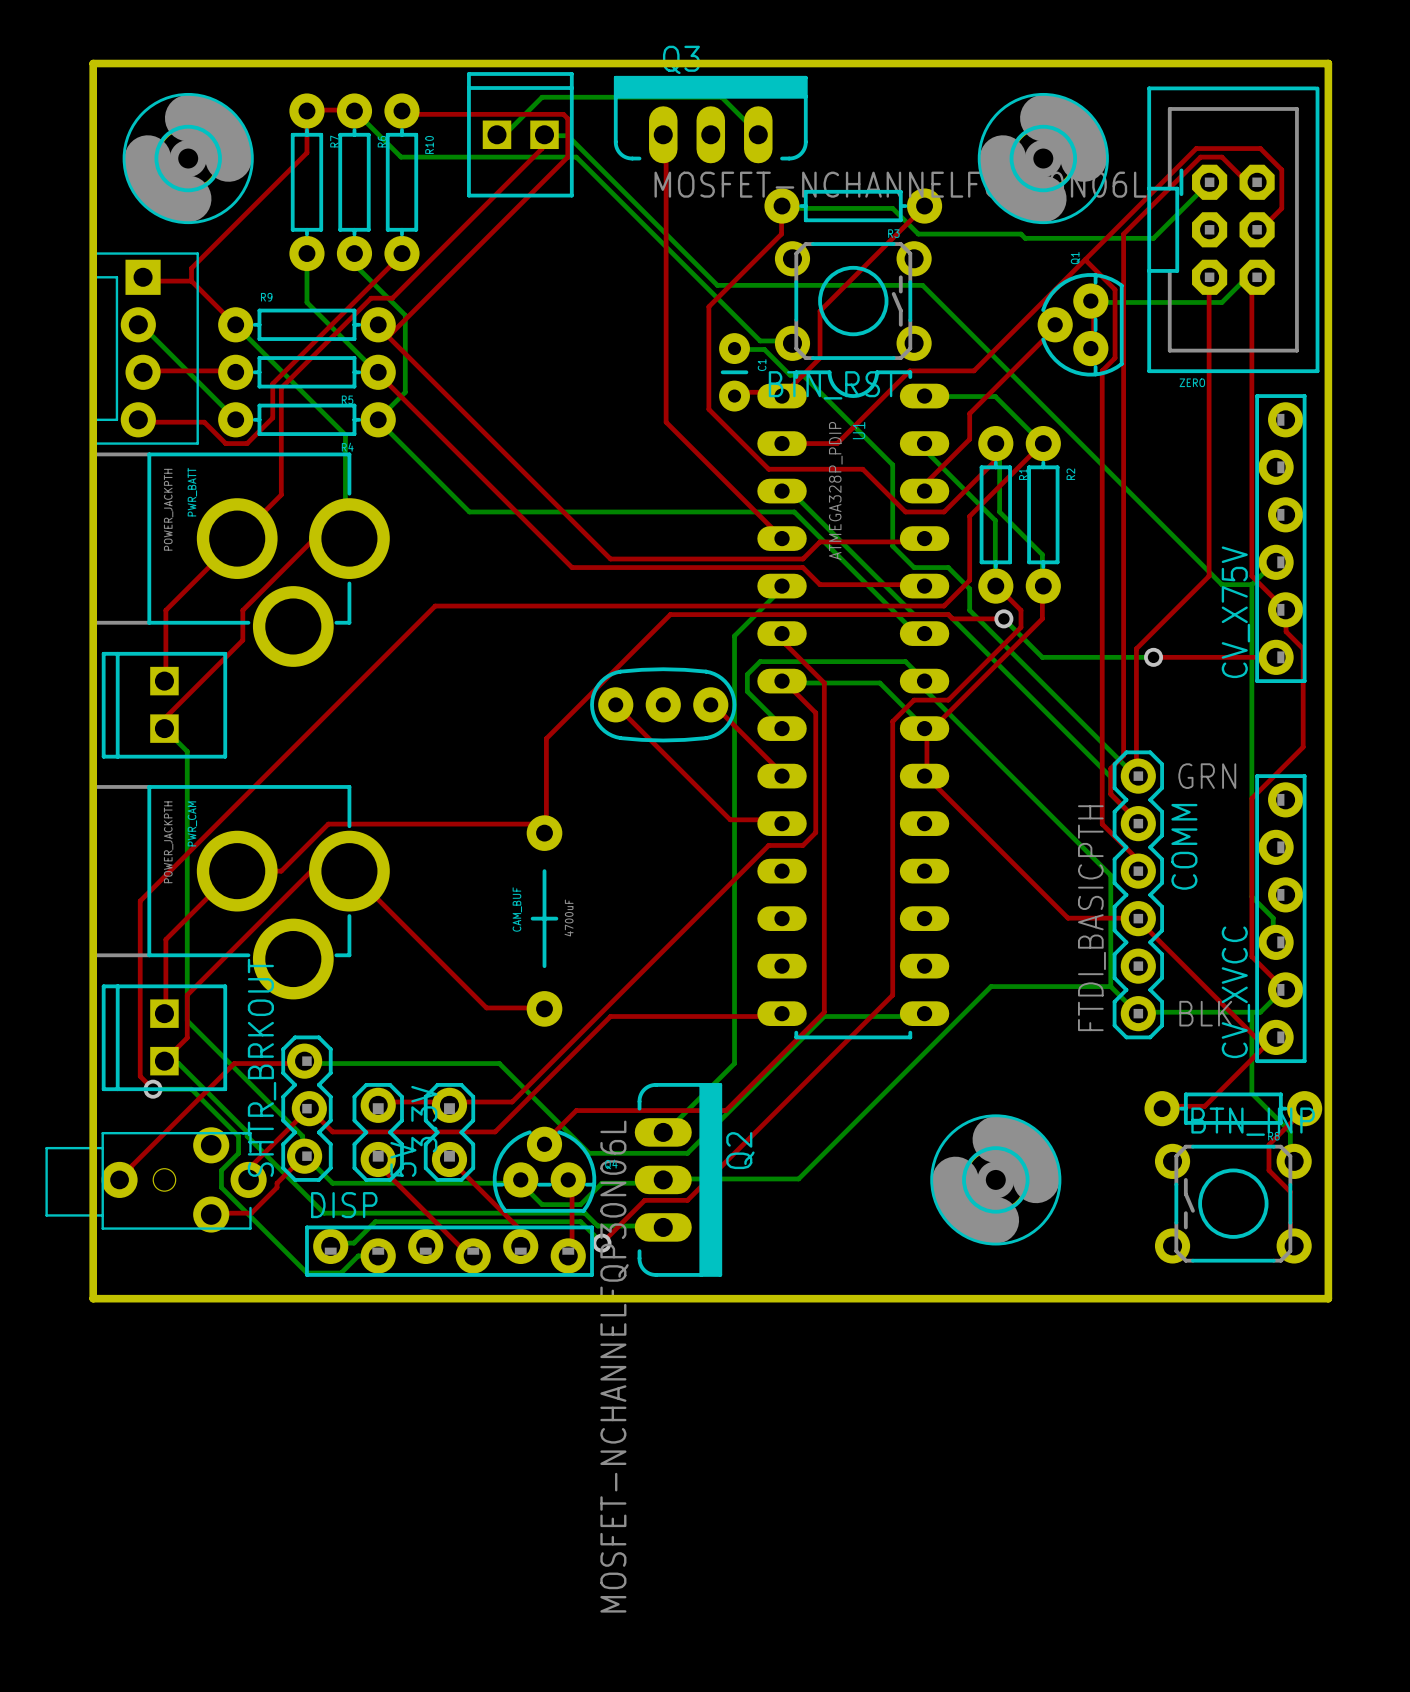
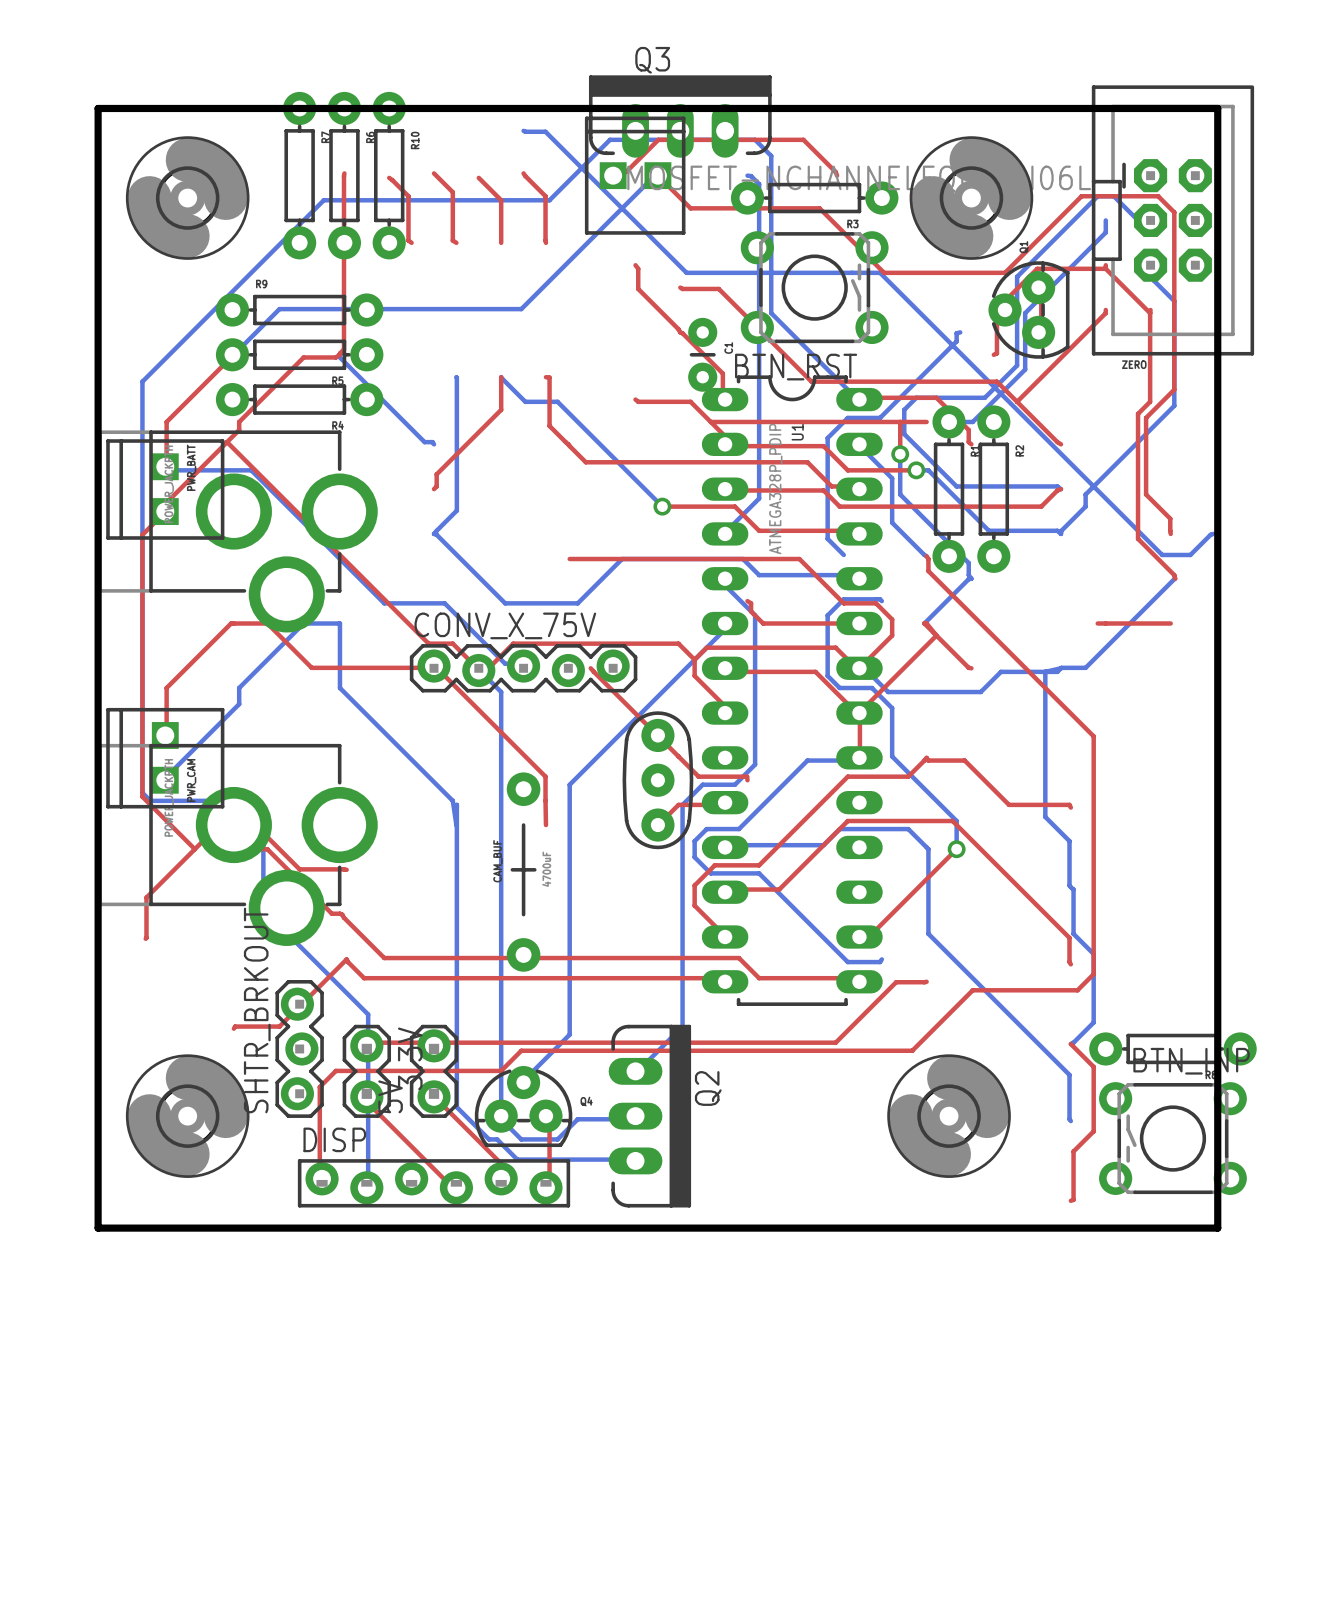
board edge: (93, 111) (93, 63) (1328, 63) (1328, 1298) (1280, 1298) -> (98, 108) (1217, 108) (1217, 1228)
top track: (354, 111) (306, 110) (306, 152) (191, 268) (191, 281) -> none
bottom track: (354, 111) (401, 157) (576, 157) (760, 340) (790, 340) (792, 343) -> none
top track: (401, 111) (405, 114) (563, 114) (567, 118) (567, 157) (388, 336) (378, 324) (379, 328) (610, 559) (794, 559) -> (662, 506) (734, 506) (759, 530)
bottom track: (497, 134) (499, 131) (507, 131) (542, 97) (721, 97) (758, 134) -> none
part position: (520, 134) -> (635, 175)
top track: (544, 134) (542, 135) (542, 148) (392, 298) (371, 298) (281, 387) (281, 494) (165, 610) (164, 681) -> none
top track: (663, 134) (666, 135) (666, 281) -> (635, 265) (638, 268)
part position: (188, 158) -> (187, 198)
part position: (1043, 158) -> (971, 198)
top track: none -> (344, 173) (343, 349) (335, 357) (303, 357) (239, 421) (239, 430) (166, 502) (166, 510) (142, 534) (142, 796) (194, 849)
top track: none -> (434, 173) (452, 192) (452, 240) (456, 242)
top track: none -> (523, 173) (545, 196) (545, 242)
top track: none -> (613, 175) (614, 172) (626, 172) (658, 139) (803, 139) (837, 175)
top track: none -> (657, 175) (690, 208) (819, 208) (884, 272) (1005, 272) (1081, 196) (1158, 196) (1174, 212) (1174, 389) (1146, 417) (1146, 494) (1170, 518) (1170, 533)
bottom track: none -> (657, 175) (654, 176) (521, 309) (279, 309) (233, 354)
bottom track: none -> (747, 175) (751, 176) (759, 184) (759, 498) (725, 533)
bottom track: (1209, 182) (1153, 238) (1025, 238) (1020, 234) (918, 234) (892, 208) (785, 208) (782, 206) -> none
top track: (1257, 182) (1256, 178) (1243, 178) (1221, 157) (1200, 157) (1123, 234) (1123, 755) (1110, 768) (1110, 794) (1138, 823) -> none
top track: none -> (389, 177) (408, 196) (408, 240) (411, 242)
top track: none -> (478, 177) (501, 200) (501, 242)
top track: (782, 206) (781, 234) (708, 306) (708, 409) (721, 422) -> (635, 399) (638, 401) (690, 401)
top track: (924, 206) (820, 311) (820, 358) (782, 396) (781, 392) (734, 392) (734, 396) -> none
bottom track: none -> (1150, 220) (1138, 220) (1113, 196) (1097, 196) (1017, 276) (1017, 365) (984, 397) (916, 397) (904, 409) (904, 434) (956, 486) (1057, 486) (1061, 489)
top track: (1257, 229) (1260, 229) (1281, 208) (1281, 169) (1260, 148) (1196, 148) (973, 370) (909, 370) (837, 443) -> (926, 421) (799, 421)
bottom track: (306, 253) (306, 302) (378, 372) -> none
bottom track: (354, 253) (358, 255) (358, 268) (405, 315) (405, 392) (378, 419) (469, 511) (794, 511) (914, 631) -> (956, 849) (956, 821) (892, 756) (892, 708) (872, 687) (839, 687) (827, 675) (827, 615) (843, 599) (872, 599)
top track: (401, 253) (272, 383) (272, 417) (247, 443) (225, 443) (204, 422) (140, 422) (138, 419) -> none
top track: (1085, 259) (1115, 289) (1115, 358) (1102, 370) (1102, 824) (1136, 858) (1136, 871) (1138, 871) -> none
top track: (143, 277) (144, 281) (191, 281) -> none
top track: none -> (1105, 265) (1105, 268)
top track: (1209, 277) (1209, 328) -> none
bottom track: none -> (1150, 265) (1154, 268) (1154, 280) (1174, 301) (1174, 405) (1085, 494) (1085, 506) (1061, 530) (1061, 533) (1057, 530) (988, 530) (928, 470) (916, 470)
top track: (1257, 277) (1251, 285) (1251, 576) (1286, 610) (1286, 631) (1303, 648) (1303, 747) (1251, 798) (1251, 956) (1285, 989) -> none
bottom track: (1257, 277) (1256, 281) (1243, 281) (1221, 302) (1090, 301) -> none
top track: (191, 281) (235, 324) -> none
top track: none -> (1105, 268) (1150, 313) (1150, 310)
top track: none -> (1105, 268) (1037, 268) (996, 309) (993, 310) (996, 313) (996, 353) (993, 354)
top track: none -> (680, 287) (718, 288) (811, 381) (996, 381) (1061, 444)
top track: (666, 302) (666, 422) (782, 538) -> (638, 288) (722, 373) (722, 397) (725, 399)
bottom track: (138, 324) (140, 323) (235, 419) -> none
bottom track: (235, 324) (345, 435) (345, 537) (349, 538) -> none
top track: (1055, 324) (1055, 328) (969, 413) (969, 439) (926, 482) (926, 490) (924, 491) -> none
top track: none -> (1105, 310) (1105, 313) (1017, 401)
part: (145, 348) -> none
bottom track: (734, 348) (764, 349) (790, 375) (802, 375) (892, 464) (892, 546) (914, 567) (948, 567) (969, 588) (969, 610) (1136, 777) (1138, 776) -> none
top track: (143, 372) (235, 372) -> none
top track: none -> (233, 354) (166, 421) (165, 466)
bottom track: none -> (339, 354) (339, 357) (424, 442) (432, 442) (434, 444)
top track: (378, 372) (572, 567) (802, 567) (820, 584) (924, 586) -> none
bottom track: none -> (456, 377) (456, 510) (434, 533) (505, 603) (577, 603) (622, 559) (743, 559) (759, 575) (855, 575) (859, 578)
top track: none -> (501, 377) (501, 409) (436, 474) (436, 486) (434, 489)
bottom track: none -> (501, 377) (525, 401) (557, 401) (662, 506)
top track: none -> (545, 377) (549, 377) (549, 426) (585, 462) (807, 462) (831, 486) (855, 486) (859, 489)
bottom track: (924, 396) (995, 396) (1043, 443) -> none
top track: none -> (859, 399) (859, 397) (936, 397) (968, 430) (968, 442) (971, 444)
top track: (1209, 422) (1209, 576) (1136, 648) (1136, 772) (1138, 776) -> (1150, 401) (1138, 413) (1138, 538) (1174, 575) (1175, 578)
top track: none -> (710, 421) (747, 421)
bottom track: (924, 443) (926, 443) (926, 452) (995, 520) (995, 586) -> none
top track: none -> (900, 421) (900, 454)
top track: (995, 443) (995, 460) (944, 511) (905, 511) (888, 494) -> (916, 470) (847, 470)
bottom track: (999, 443) (999, 511) (1042, 554) (1043, 586) -> (952, 421) (972, 421) (1025, 369) (1025, 313) (1105, 232) (1105, 220)
top track: (1043, 443) (969, 516) (969, 580) (944, 606) (435, 606) (140, 901) (140, 1076) (153, 1089) -> none
top track: none -> (227, 442) (428, 643) (452, 643) (478, 670) (481, 667) (489, 667) (513, 643) (678, 643) (694, 659)
bottom track: none -> (859, 444) (892, 478) (892, 522) (926, 556)
bottom track: none -> (900, 454) (900, 494) (968, 563) (968, 575) (971, 578) (968, 579) (924, 623) (926, 623)
via: none -> (900, 454)
bottom track: none -> (165, 466) (166, 470) (251, 470) (384, 603) (444, 603) (505, 663) (521, 663) (523, 666)
bottom track: (782, 491) (785, 494) (794, 494) (867, 567) -> (960, 332) (956, 333) (956, 341) (880, 417) (847, 417) (827, 438) (827, 538)
via: none -> (916, 470)
top track: none -> (725, 489) (823, 490) (839, 506) (1041, 506) (1061, 489)
part: none -> (165, 489)
via: none -> (662, 506)
top track: (349, 538) (345, 541) (311, 541) (242, 610) (242, 640) (165, 717) (164, 728) -> none
top track: (924, 538) (922, 541) (820, 541) (802, 559) -> (859, 533) (855, 530) (767, 530)
CV_X75V: (1280, 538) -> none
bottom track: (884, 584) (914, 614) (948, 614) (1110, 777) (1110, 794) (1138, 823) -> none
bottom track: (1251, 584) (1251, 896) (1273, 918) (1273, 939) (1276, 942) -> none
bottom track: (782, 586) (781, 588) (734, 635) (734, 1063) (713, 1084) -> (725, 578) (726, 579) (726, 587) (755, 615) (755, 764) (734, 784) (702, 784) (682, 804) (682, 1026)
top track: (995, 586) (1020, 610) (1020, 627) (948, 700) (914, 700) (892, 721) (892, 995) (687, 1200) (644, 1200) (601, 1243) -> none
top track: (1043, 586) (1042, 618) (926, 734) (924, 728) (926, 730) (926, 772) (924, 776) (1068, 918) (1138, 918) (1140, 922) (1264, 1046) (1276, 1037) (1273, 1037) (1204, 1106) (1162, 1106) (1162, 1108) -> none
top track: none -> (569, 559) (799, 559) (843, 603) (876, 603) (892, 619) (892, 635) (859, 668) (855, 667) (835, 647) (706, 647) (694, 659)
bottom track: none -> (1175, 578) (1085, 667) (1061, 667) (1057, 671) (1000, 671) (980, 692) (888, 692) (867, 671) (859, 671) (859, 668)
top track: (1003, 618) (952, 618) (948, 614) (670, 614) (546, 738) (546, 832) (544, 833) (546, 824) (328, 824) (281, 871) (234, 871) (165, 939) (164, 1013) -> none
bottom track: (1003, 618) (1042, 657) (1153, 657) -> none
via: (1003, 618) -> none
top track: (798, 657) (824, 683) (824, 1012) (725, 1110) -> (926, 556) (928, 571) (1093, 736) (1093, 974) (1077, 990) (972, 990) (912, 1050) (694, 1050)
top track: none -> (763, 623) (859, 623)
via: (1153, 657) -> none
top track: (1230, 657) (1276, 657) -> none
bottom track: (755, 665) (760, 661) (905, 661) (926, 683) (926, 691) (1097, 862) -> (1061, 668) (1045, 671) (1045, 816)
bottom track: (747, 674) (747, 691) (781, 725) (782, 728) -> (714, 639) (569, 784) (569, 1034) (523, 1082)
top track: (782, 681) (815, 712) (815, 832) (802, 845) (768, 845) (512, 1102) -> (926, 981) (896, 982) (835, 1042) (493, 1042)
bottom track: (782, 681) (785, 683) (879, 683) (924, 728) -> none
top track: none -> (694, 659) (694, 675) (722, 704) (722, 712) (725, 713)
CONV_X_75V: none -> (523, 668)
part rotation: 0° (663, 704) -> 90° clockwise (657, 780)
part position: (663, 704) -> (657, 780)
top track: (710, 704) (713, 704) (781, 772) (782, 776) -> none
top track: none -> (725, 668) (726, 671) (815, 671) (855, 712) (859, 713)
U1 position: (853, 704) -> (792, 690)
top track: none -> (971, 668) (968, 667) (924, 623) (926, 623) (936, 635) (859, 713)
part: (164, 705) -> none
bottom track: none -> (478, 670) (501, 692) (501, 1116)
bottom track: (164, 728) (187, 751) (187, 1020) (302, 1136) (302, 1153) (332, 1183) (520, 1183) -> none
top track: none -> (859, 713) (859, 757)
top track: none -> (165, 735) (166, 687) (231, 623) (267, 623) (311, 667) (432, 667) (434, 666) (436, 667) (545, 776) (545, 825)
part: none -> (165, 758)
top track: none -> (725, 802) (722, 804) (678, 804) (657, 825)
top track: none -> (1070, 807) (1069, 804) (1009, 804) (964, 760) (928, 760) (926, 757) (908, 776) (847, 776) (759, 865) (714, 865) (694, 885) (694, 905) (725, 937)
bottom track: (1110, 875) (1110, 986) -> (1057, 829) (1069, 841) (1069, 885) (1073, 889) (1073, 933) (1093, 954) (1093, 1022) (1070, 1044)
bottom track: none -> (725, 847) (726, 845) (823, 845) (839, 829) (908, 829) (928, 849) (928, 933) (1069, 1074) (1070, 1121)
COMM: FTDI_BASICPTH (1138, 894) -> none
top track: none -> (233, 848) (267, 849) (331, 913) (342, 914) (384, 958) (738, 958) (759, 978) (855, 978) (859, 981)
top track: none -> (956, 849) (872, 933) (859, 933) (859, 937)
via: none -> (956, 849)
top track: none -> (346, 869) (299, 869) (251, 821) (223, 821) (146, 897) (145, 938)
CV_XVCC: (1280, 918) -> none
top track: none -> (725, 892) (726, 889) (779, 889) (847, 821) (952, 821) (1069, 937) (1070, 964)
bottom track: (1110, 986) (1138, 1013) (1260, 1012) (1281, 990) (1285, 989) -> none
bottom track: (1110, 986) (991, 986) (798, 1178) (663, 1179) -> none
top track: (544, 1008) (486, 1007) (349, 871) (311, 871) (187, 995) (187, 1037) (164, 1061) -> none
bottom track: (1251, 1012) (1251, 1093) (1290, 1131) (1290, 1157) (1294, 1161) -> none
top track: (782, 1013) (781, 1016) (610, 1016) (495, 1131) -> none
bottom track: (888, 1016) (824, 1016) (687, 1153) (589, 1153) (499, 1063) (306, 1063) (304, 1061) -> (847, 962) (759, 873) (710, 873) (694, 857) (694, 841) (706, 829) (738, 829) (807, 760) (855, 760) (859, 757)
part: (164, 1037) -> none
top track: none -> (725, 981) (722, 978) (364, 978) (346, 959) (279, 1026) (235, 1026) (233, 1028)
bottom track: (164, 1061) (165, 1063) (178, 1063) (247, 1131) (247, 1136) (324, 1213) (584, 1213) (597, 1226) -> (165, 780) (166, 776) (239, 704) (239, 687) (303, 623) (339, 623) (339, 687) (452, 800) (456, 825) (456, 804) (456, 1107) (489, 1139) (497, 1139) (517, 1159) (573, 1159)
top track: (304, 1061) (302, 1063) (234, 1063) (131, 1166) (131, 1170) (119, 1179) -> none
bottom track: (153, 1089) (191, 1089) (238, 1136) (238, 1153) (221, 1170) (221, 1187) (306, 1273) (341, 1273) (358, 1255) (378, 1255) -> (859, 399) (771, 313) (771, 155) (755, 139) (610, 139) (549, 200) (323, 200) (142, 381) (142, 792) (150, 800) (223, 800) (263, 841) (263, 909) (368, 1014) (366, 1187)
via: (153, 1089) -> none
top track: none -> (1070, 1044) (1093, 1066) (1093, 1131) (1073, 1151) (1073, 1199) (1070, 1200)
top track: (1304, 1108) (1268, 1144) (1268, 1170) (1290, 1191) (1290, 1243) (1294, 1245) -> none
top track: (576, 1110) (544, 1144) -> (553, 1050) (521, 1050) (501, 1070) (477, 1070)
top track: (345, 1131) (332, 1131) (309, 1108) (251, 1166) (251, 1178) (248, 1179) -> (335, 1070) (319, 1087) (319, 1175) (322, 1178)
top track: (304, 1156) (277, 1183) (277, 1187) (251, 1213) (211, 1214) -> none
part: (156, 1179) -> none
part: none -> (187, 1116)
bottom track: (601, 1243) (580, 1221) (375, 1221) (354, 1243) (332, 1243) (330, 1246) -> none
via: (601, 1243) -> none
Q2 value: MOSFET-NCHANNELFQP30N06L (614, 1366) -> none

